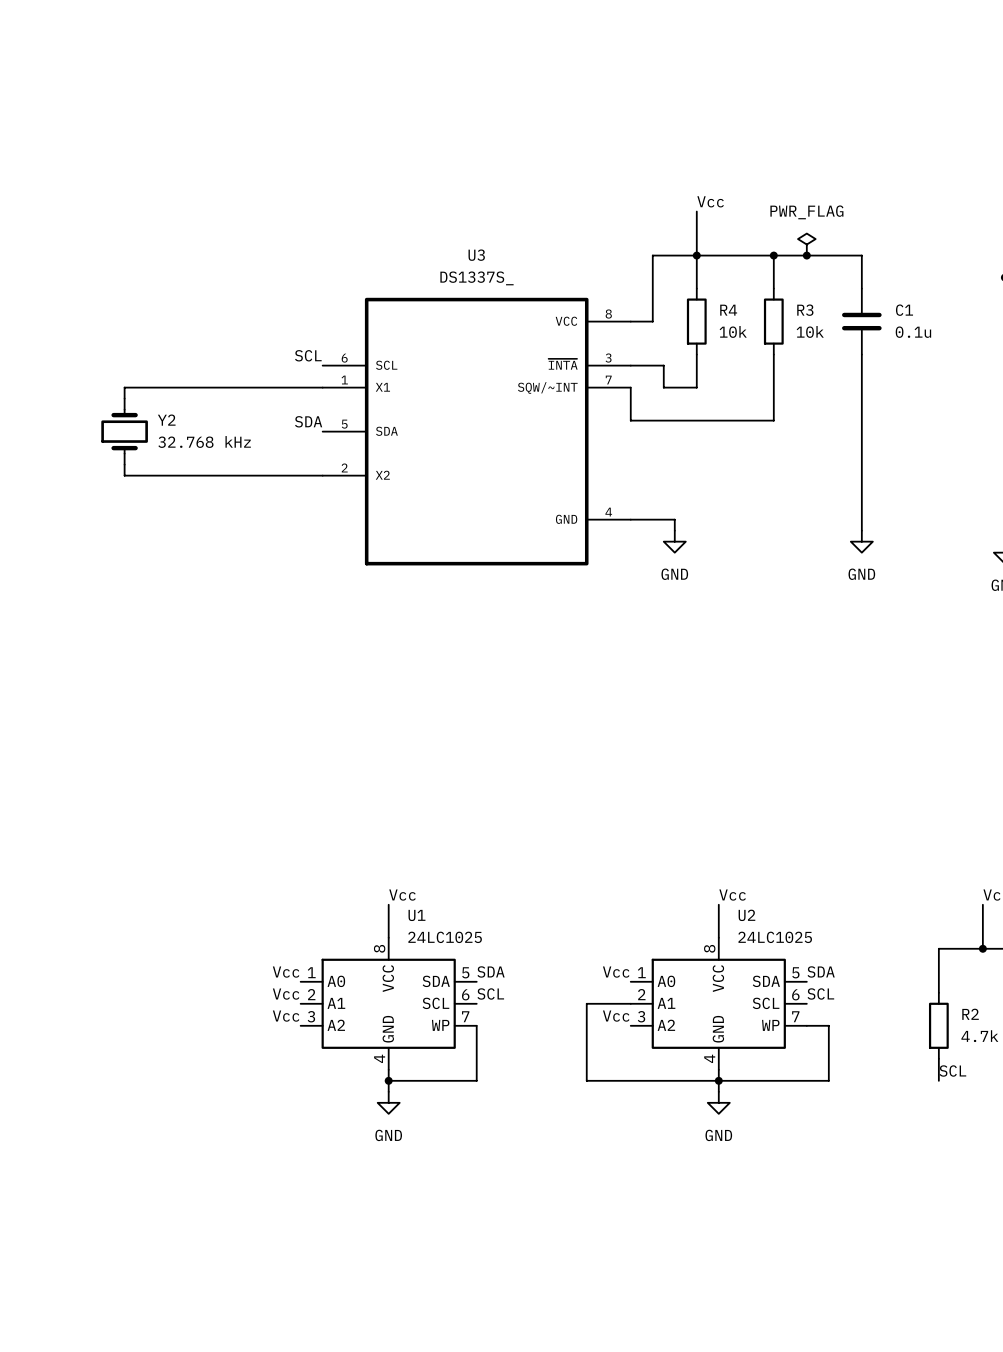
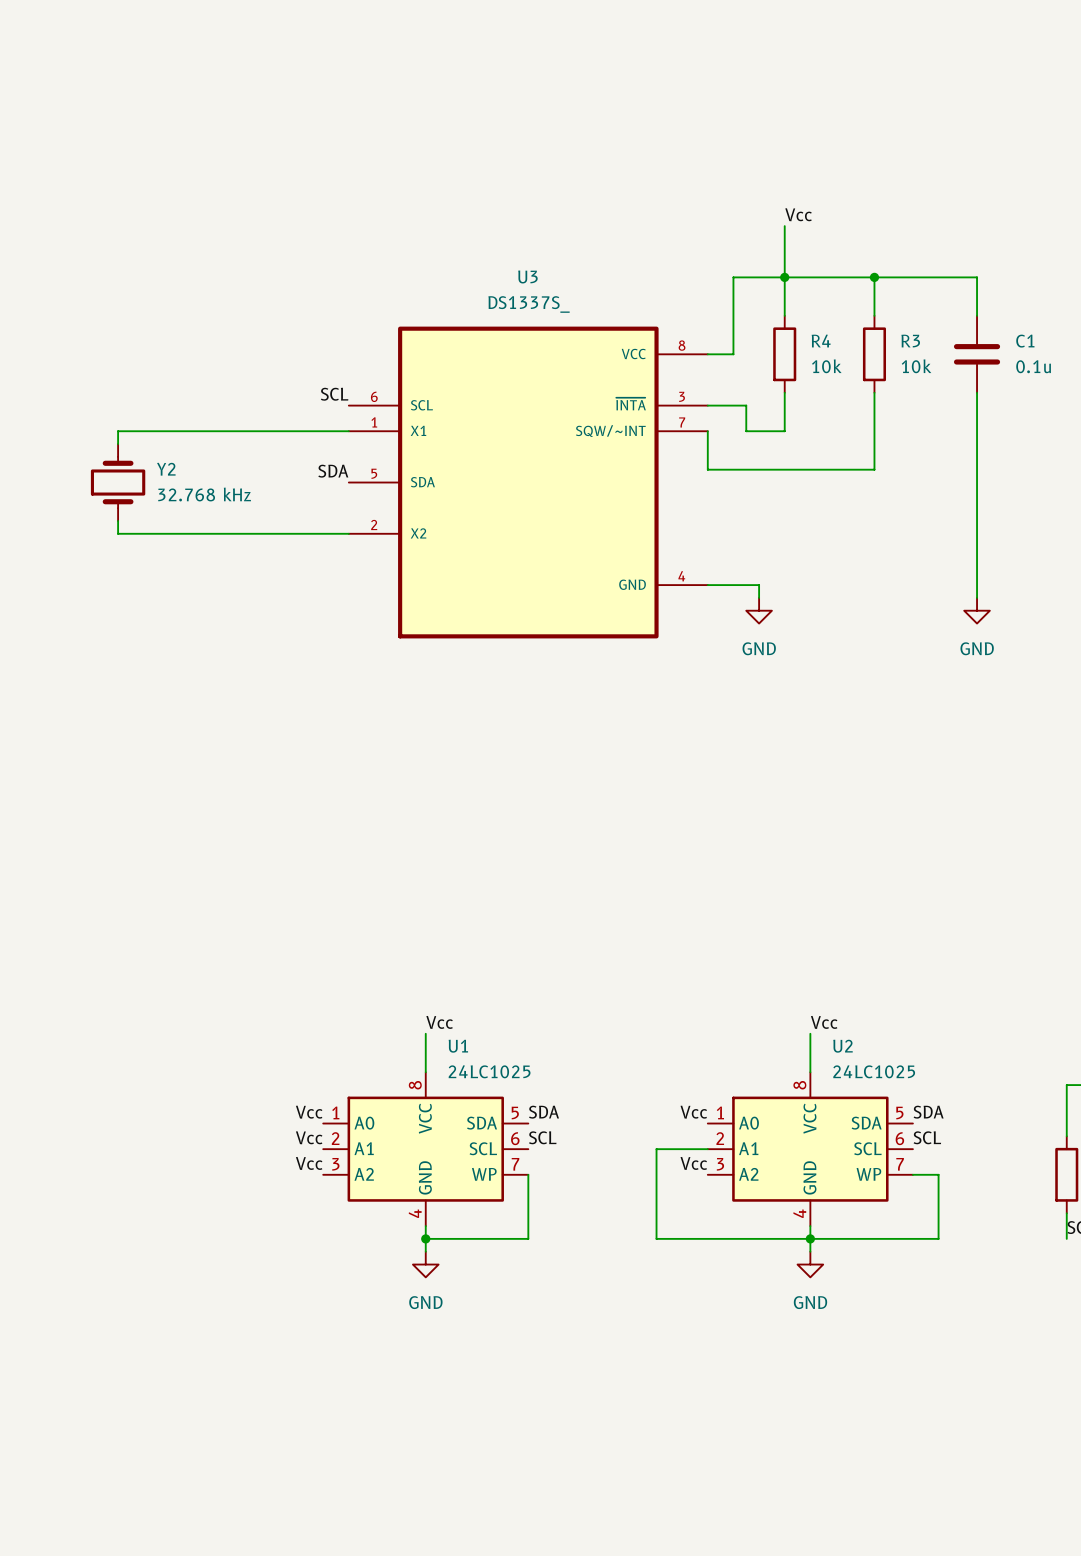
power symbol: PWR_FLAG (806, 244) -> none
junction: (806, 255) -> none

